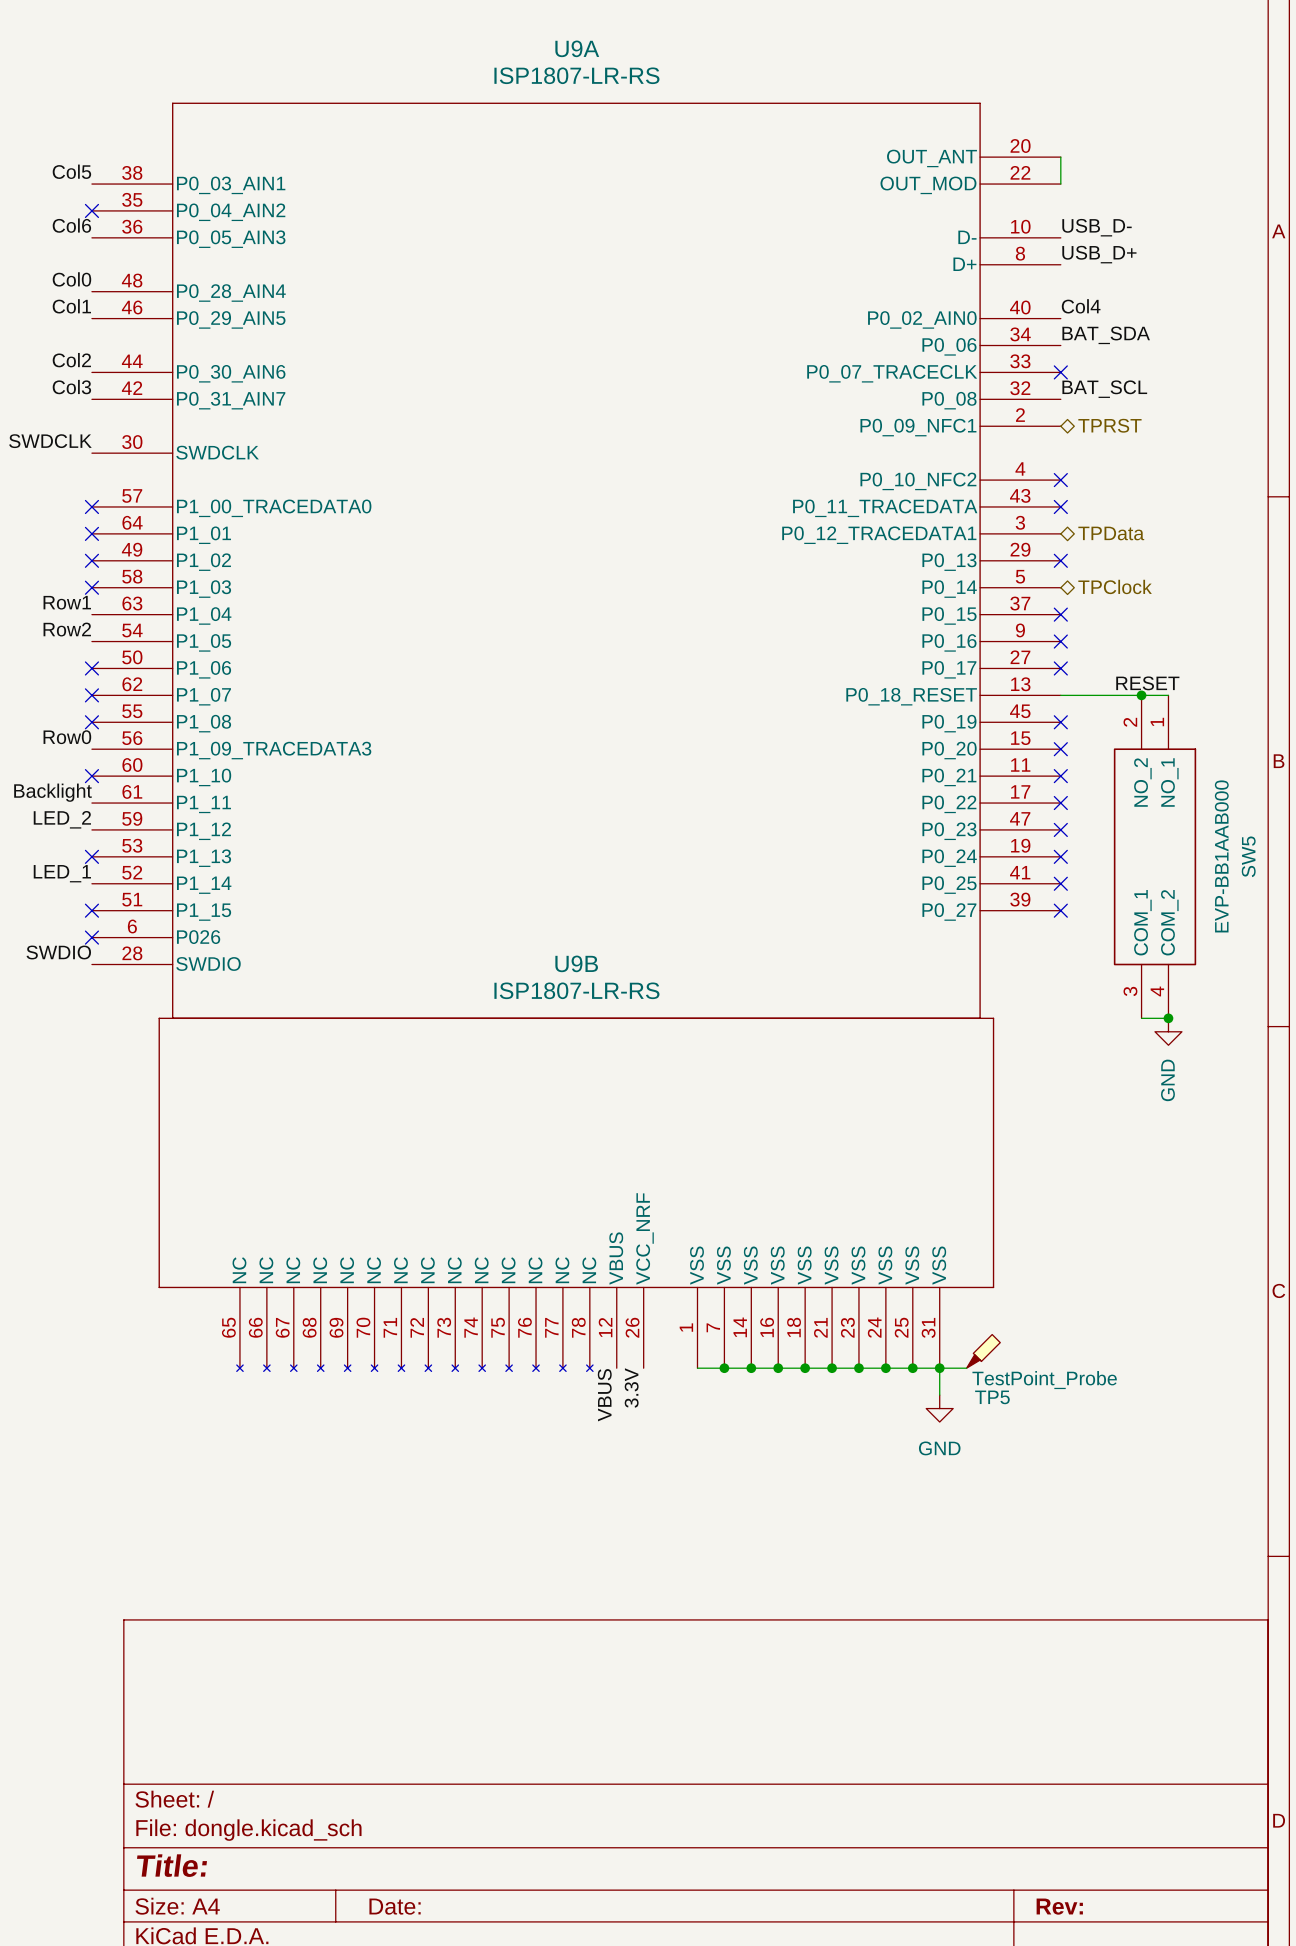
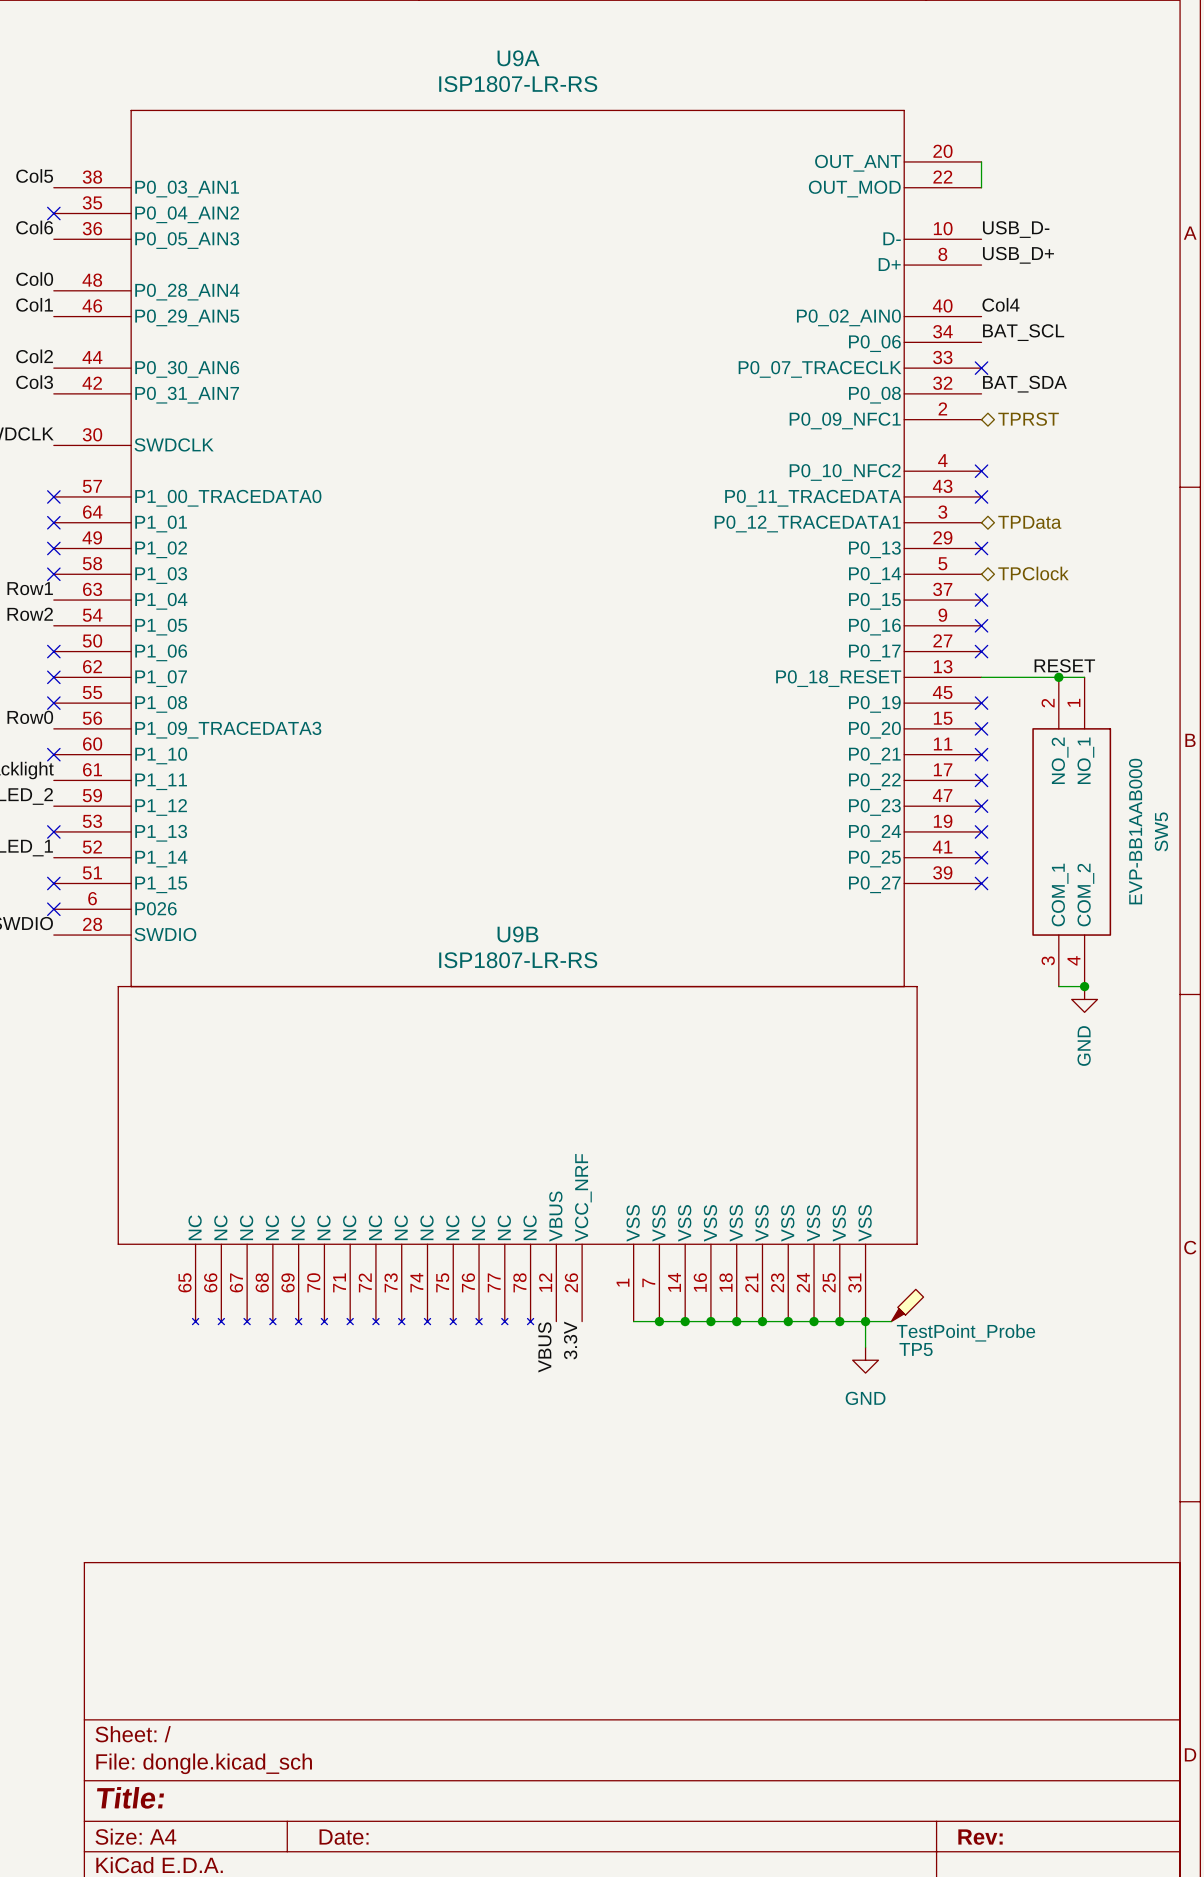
label: BAT_SDA (1106, 335) -> BAT_SCL (1023, 332)
label: BAT_SCL (1104, 389) -> BAT_SDA (1024, 384)

